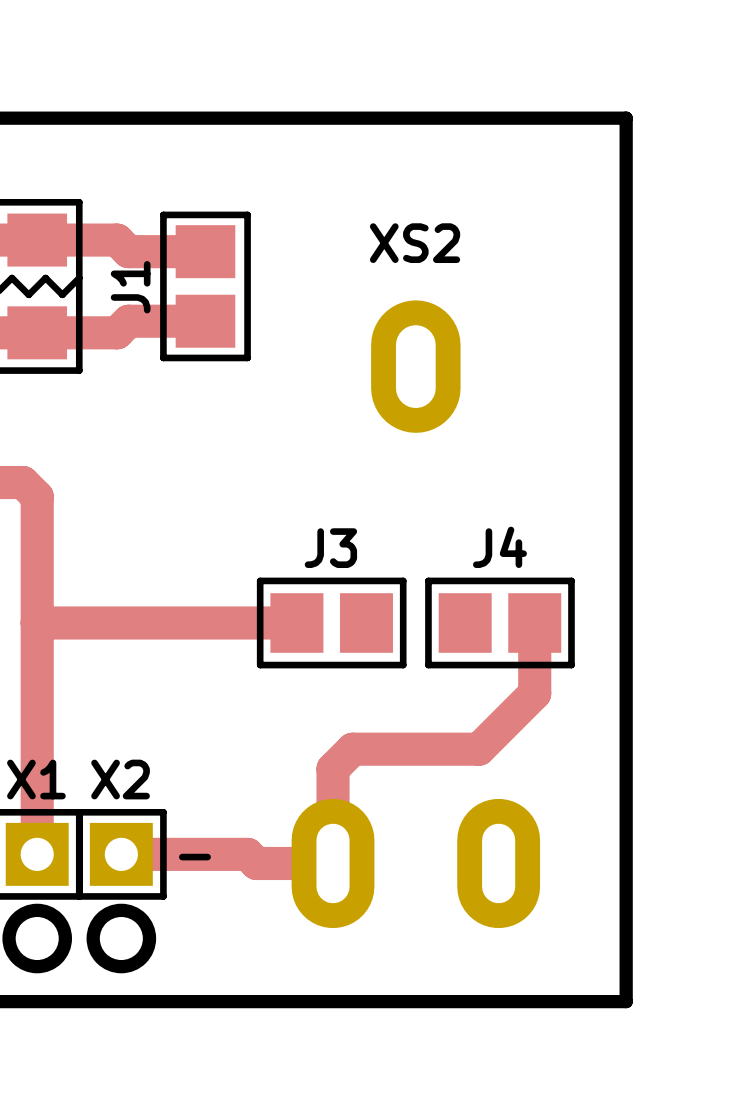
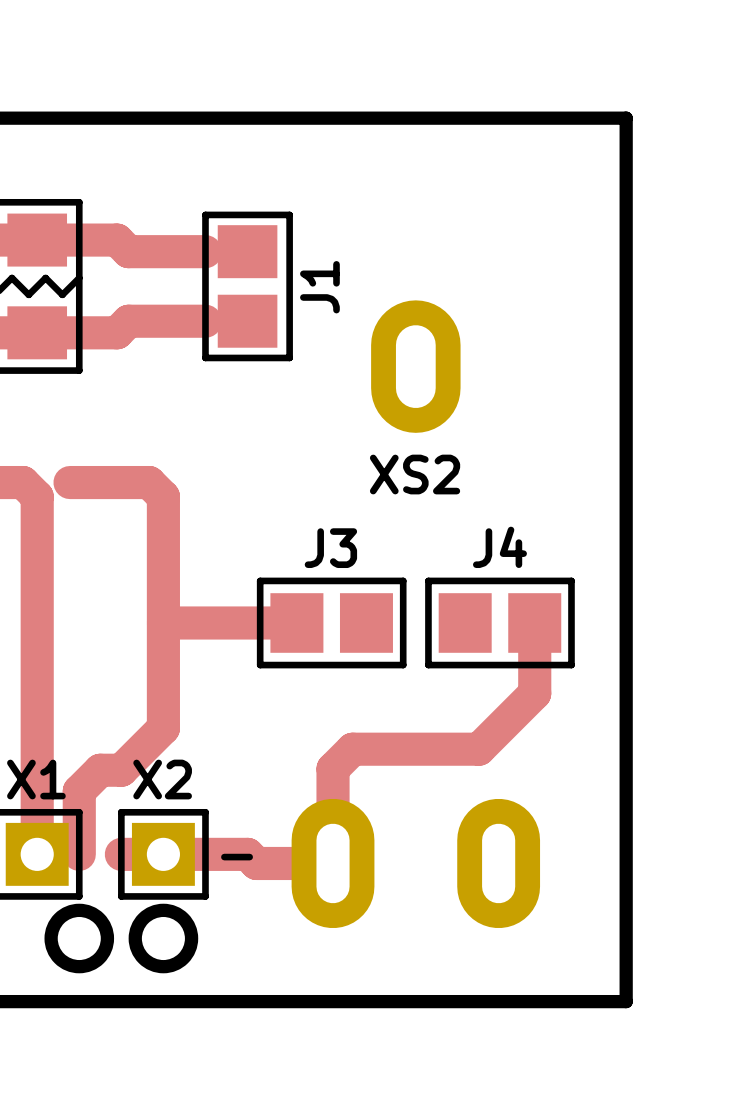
XS2 name position: XS2 (415, 243) -> XS2 (415, 474)
J1 position: (205, 286) -> (247, 286)
J1 name position: J1 (130, 287) -> J1 (319, 287)
track: none -> (70, 482) (149, 482) (163, 496) (163, 728) (121, 770) (100, 770) (79, 791) (79, 854)
track: (37, 622) (163, 622) -> none
X2 position: (121, 854) -> (163, 854)
text position: - (194, 857) -> - (237, 857)
round board edge: [2, 903, 72, 974] -> none
round board edge: none -> [44, 903, 115, 974]
round board edge: [86, 903, 157, 974] -> none
round board edge: none -> [128, 903, 199, 974]

